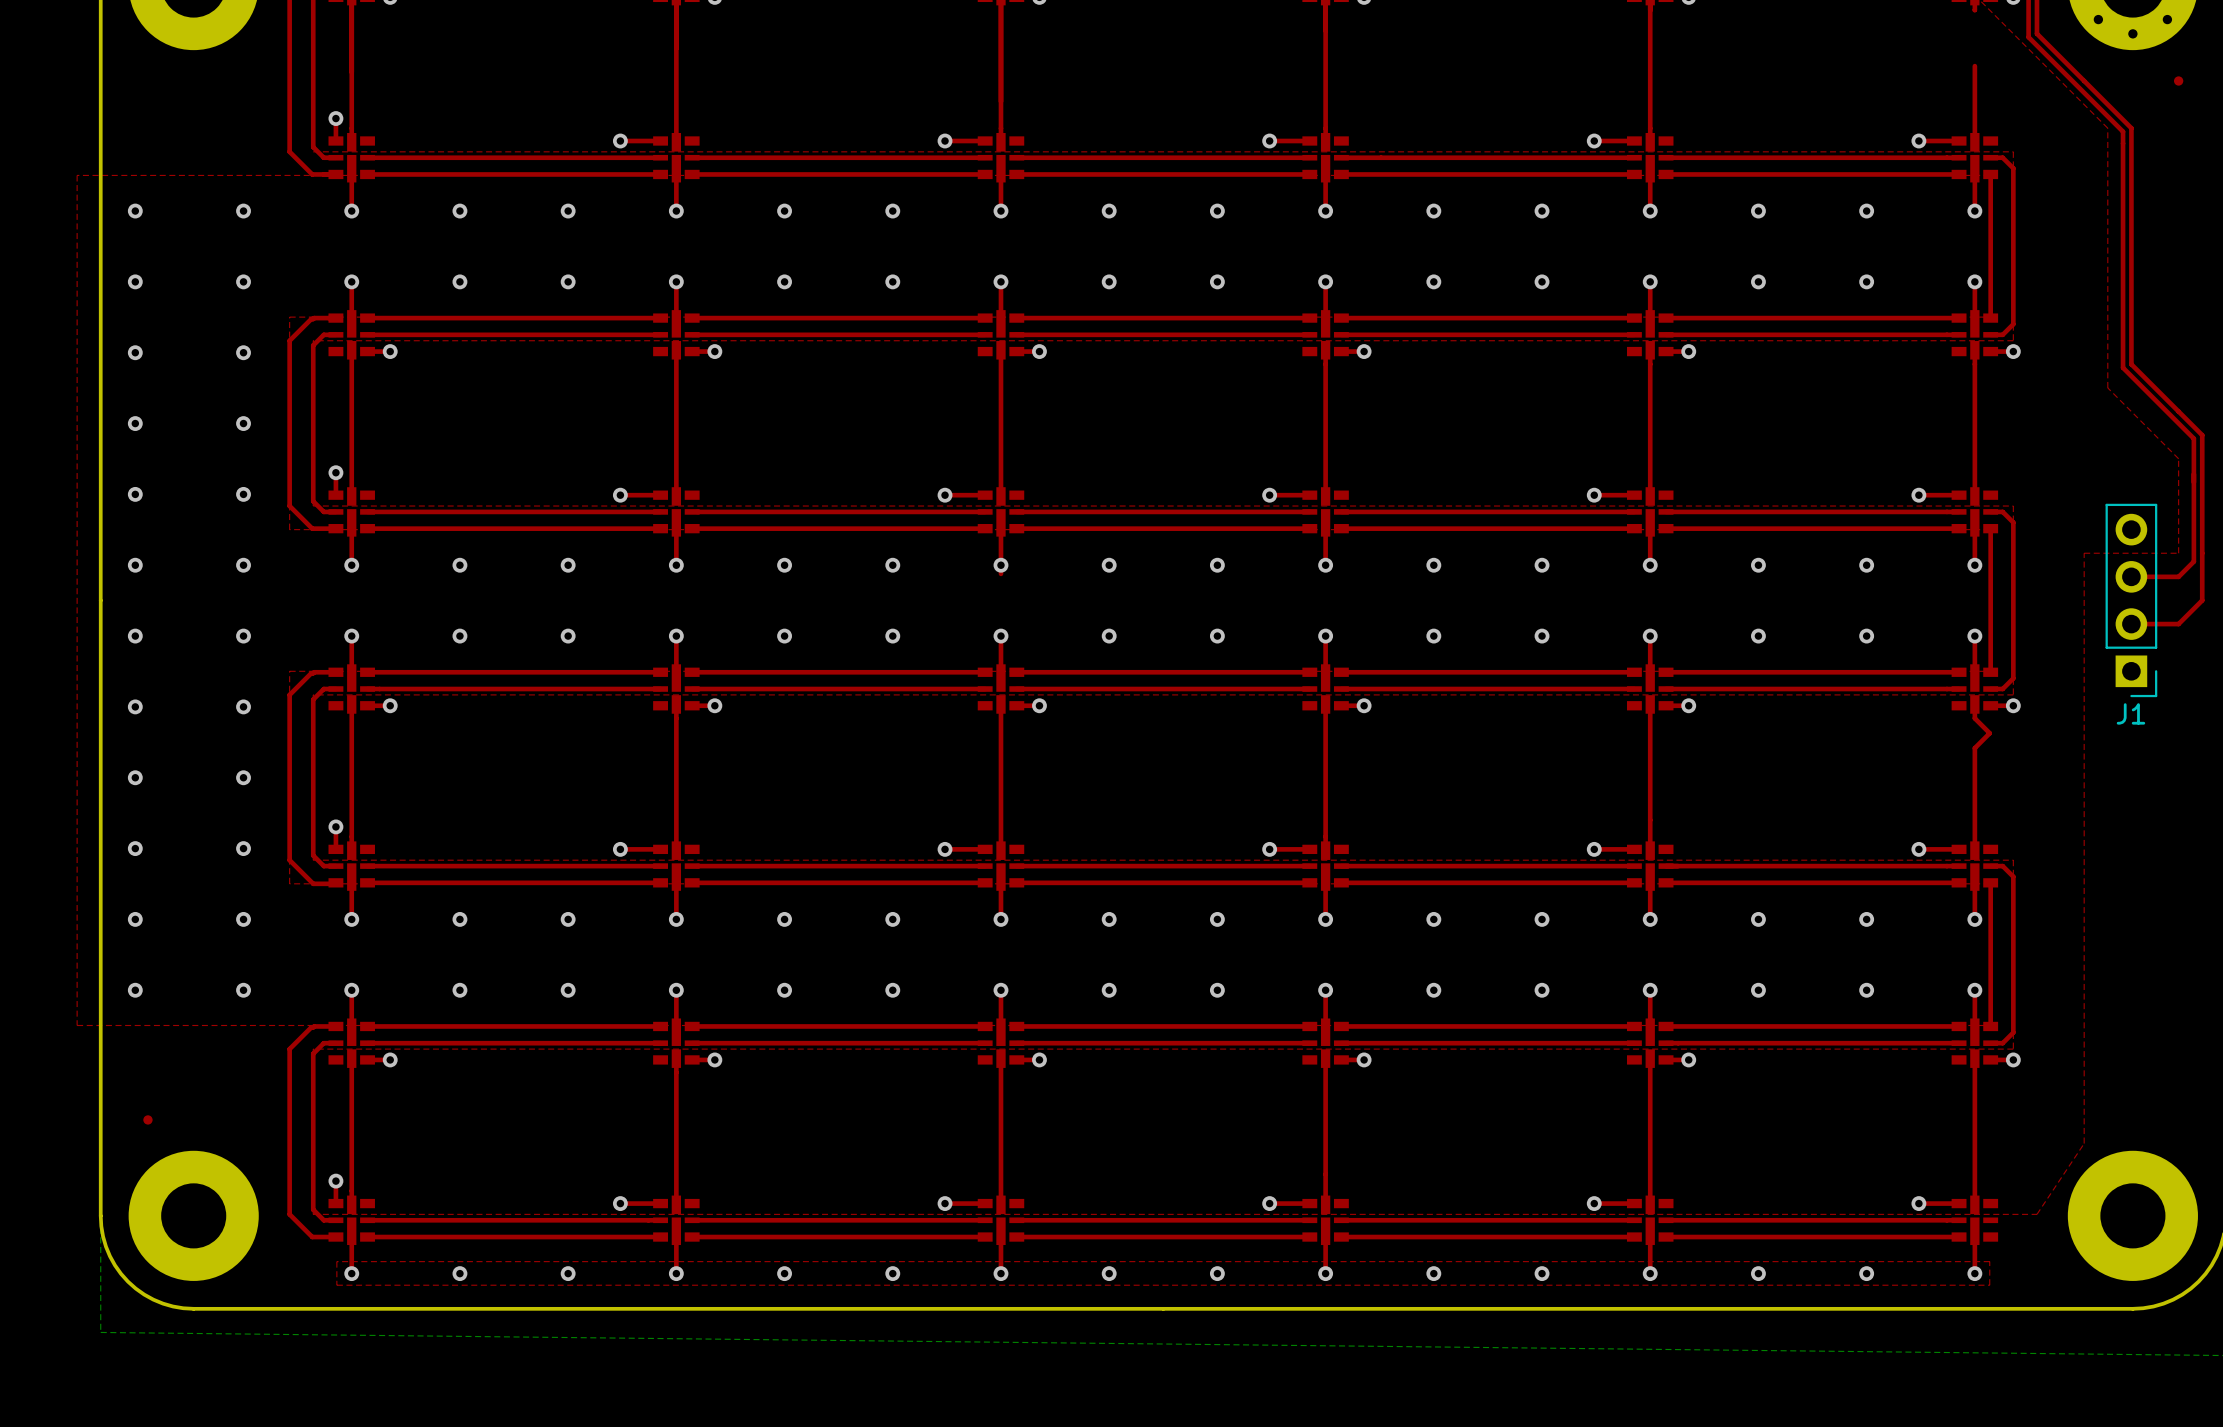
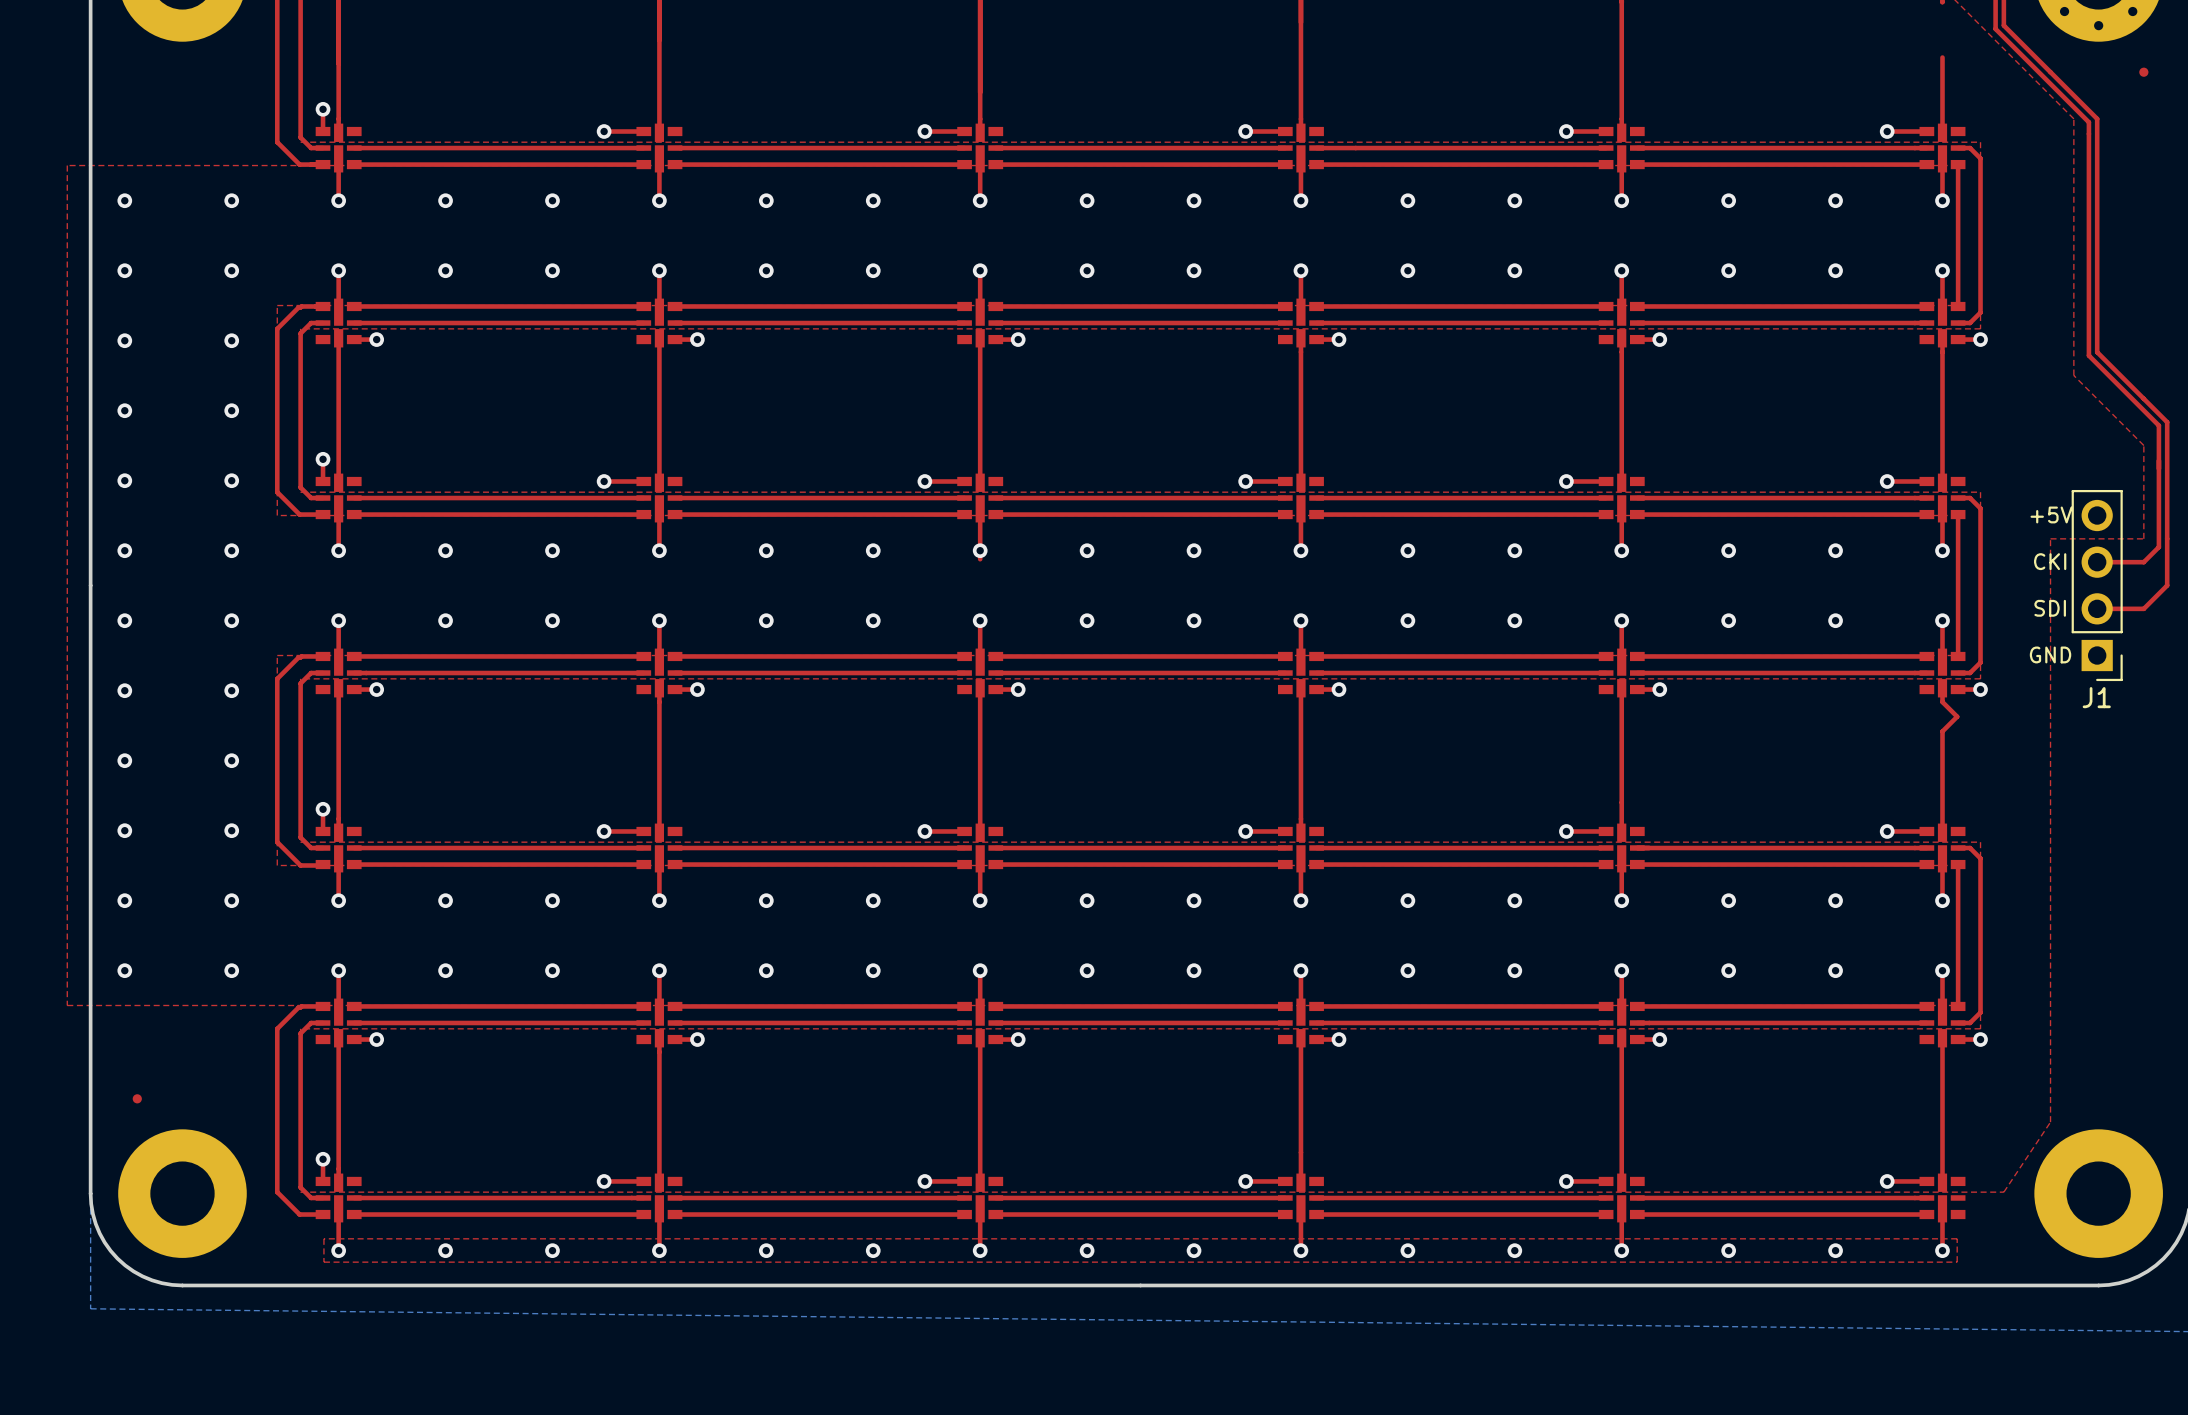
text: none -> +5V (2051, 514)
text: none -> CKI (2050, 561)
text: none -> SDI (2050, 608)
text: none -> GND (2050, 654)

